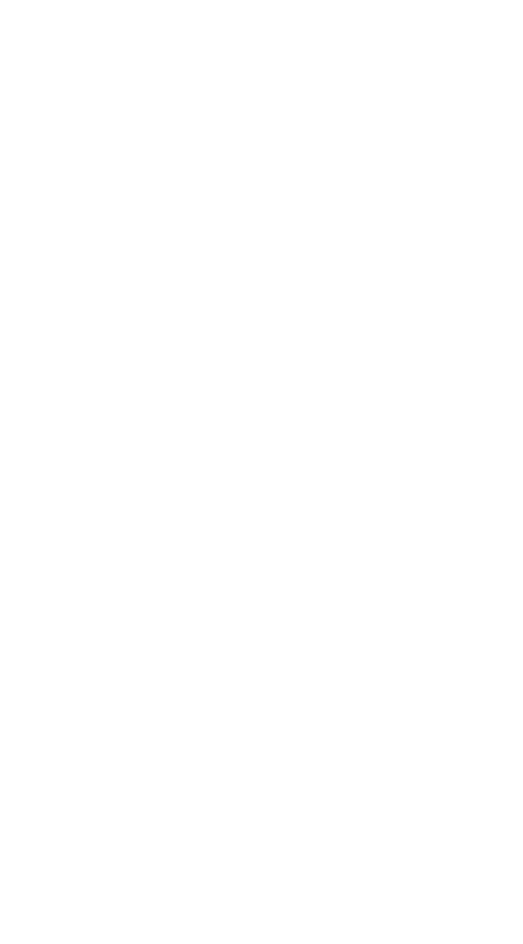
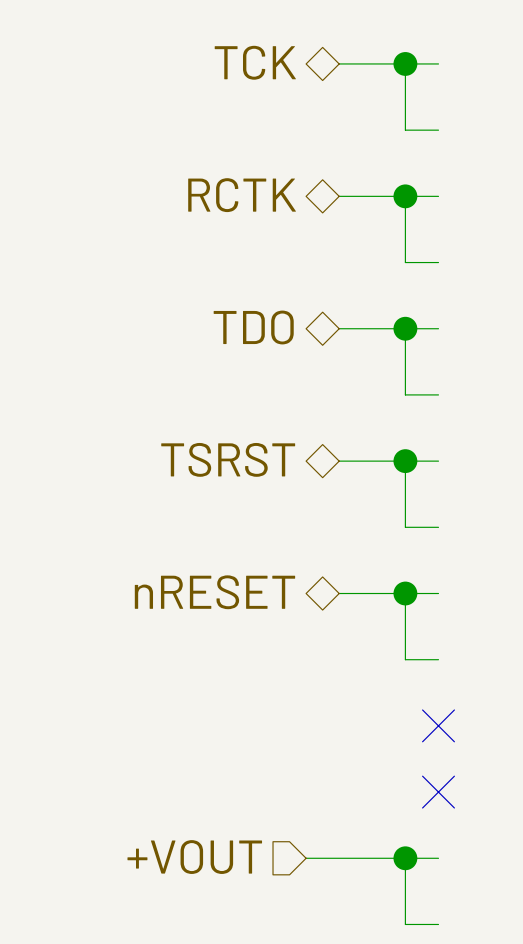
hierarchical label: none -> TCK (255, 62)
wire: none -> (339, 63) (438, 63)
wire: none -> (405, 63) (405, 130) (438, 130)
junction: none -> (405, 63)
hierarchical label: none -> RCTK (242, 195)
wire: none -> (339, 196) (438, 196)
wire: none -> (405, 196) (405, 262) (438, 262)
junction: none -> (405, 196)
hierarchical label: none -> TDO (253, 327)
wire: none -> (339, 328) (438, 328)
wire: none -> (405, 328) (405, 394) (438, 394)
junction: none -> (405, 328)
hierarchical label: none -> TSRST (228, 459)
wire: none -> (339, 461) (438, 461)
wire: none -> (405, 461) (405, 527) (438, 527)
junction: none -> (405, 461)
hierarchical label: none -> nRESET (214, 592)
wire: none -> (339, 593) (438, 593)
wire: none -> (405, 593) (405, 659) (438, 659)
junction: none -> (405, 593)
no-connect mark: none -> (438, 725)
no-connect mark: none -> (438, 792)
hierarchical label: none -> +VOUT (194, 857)
wire: none -> (306, 858) (438, 858)
wire: none -> (405, 858) (405, 924) (438, 924)
junction: none -> (405, 858)

